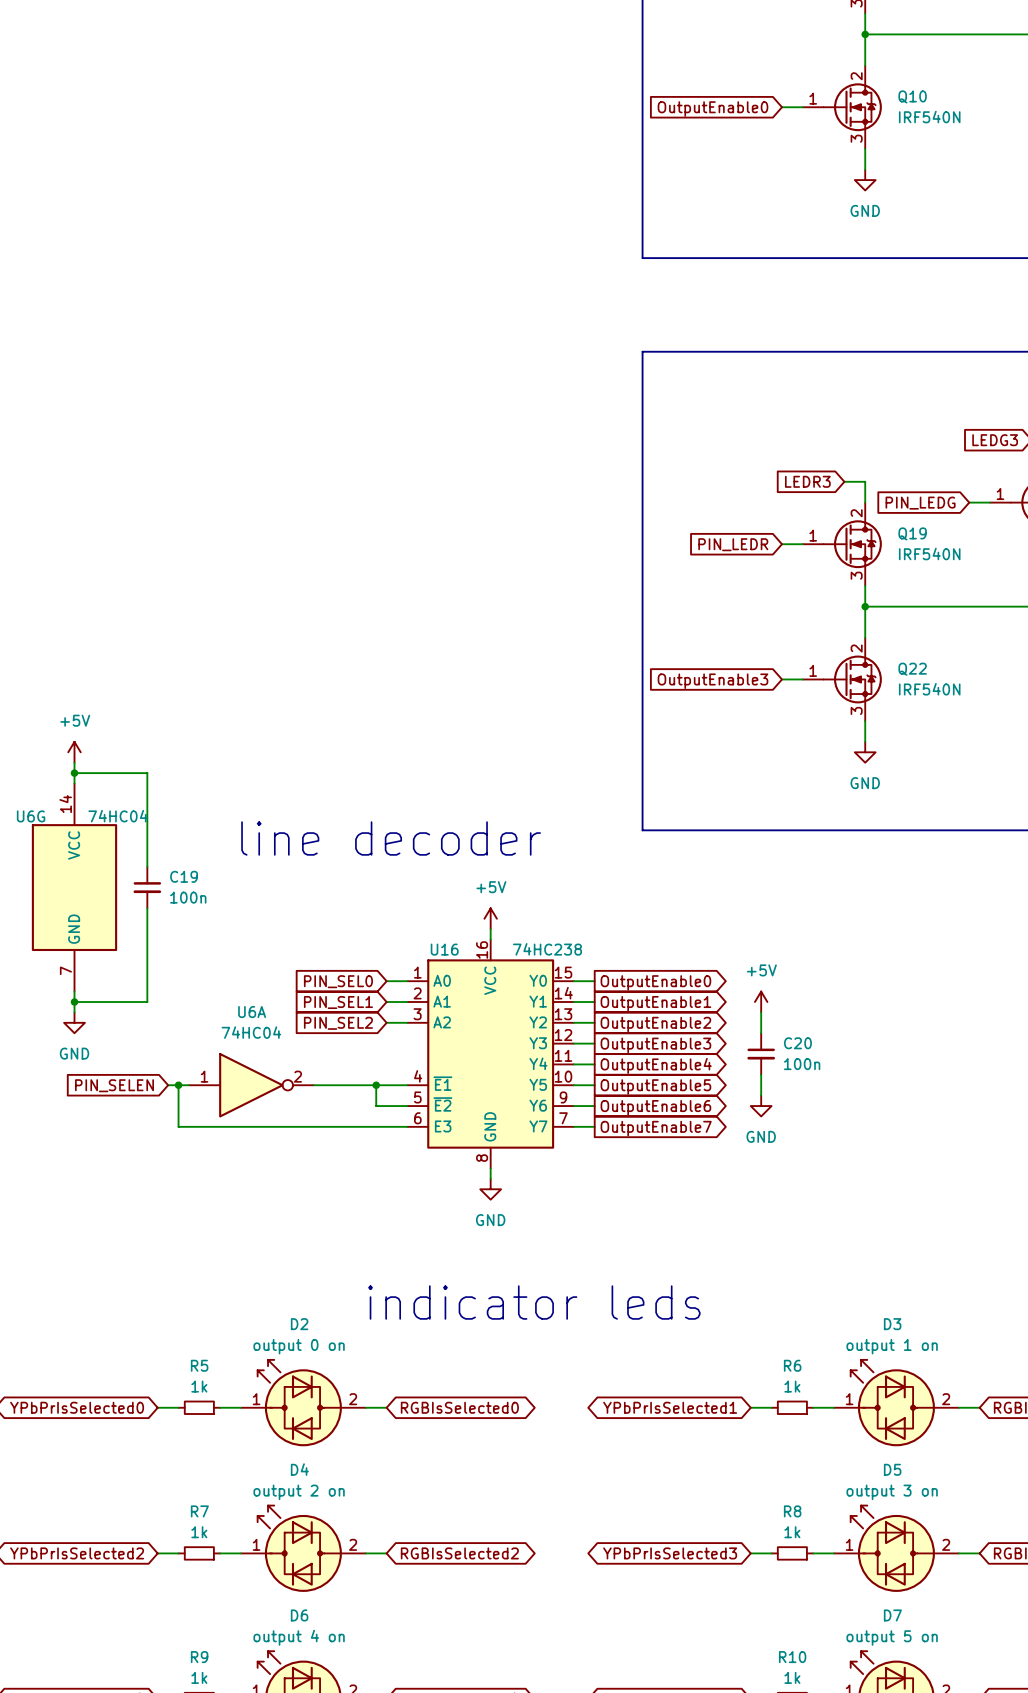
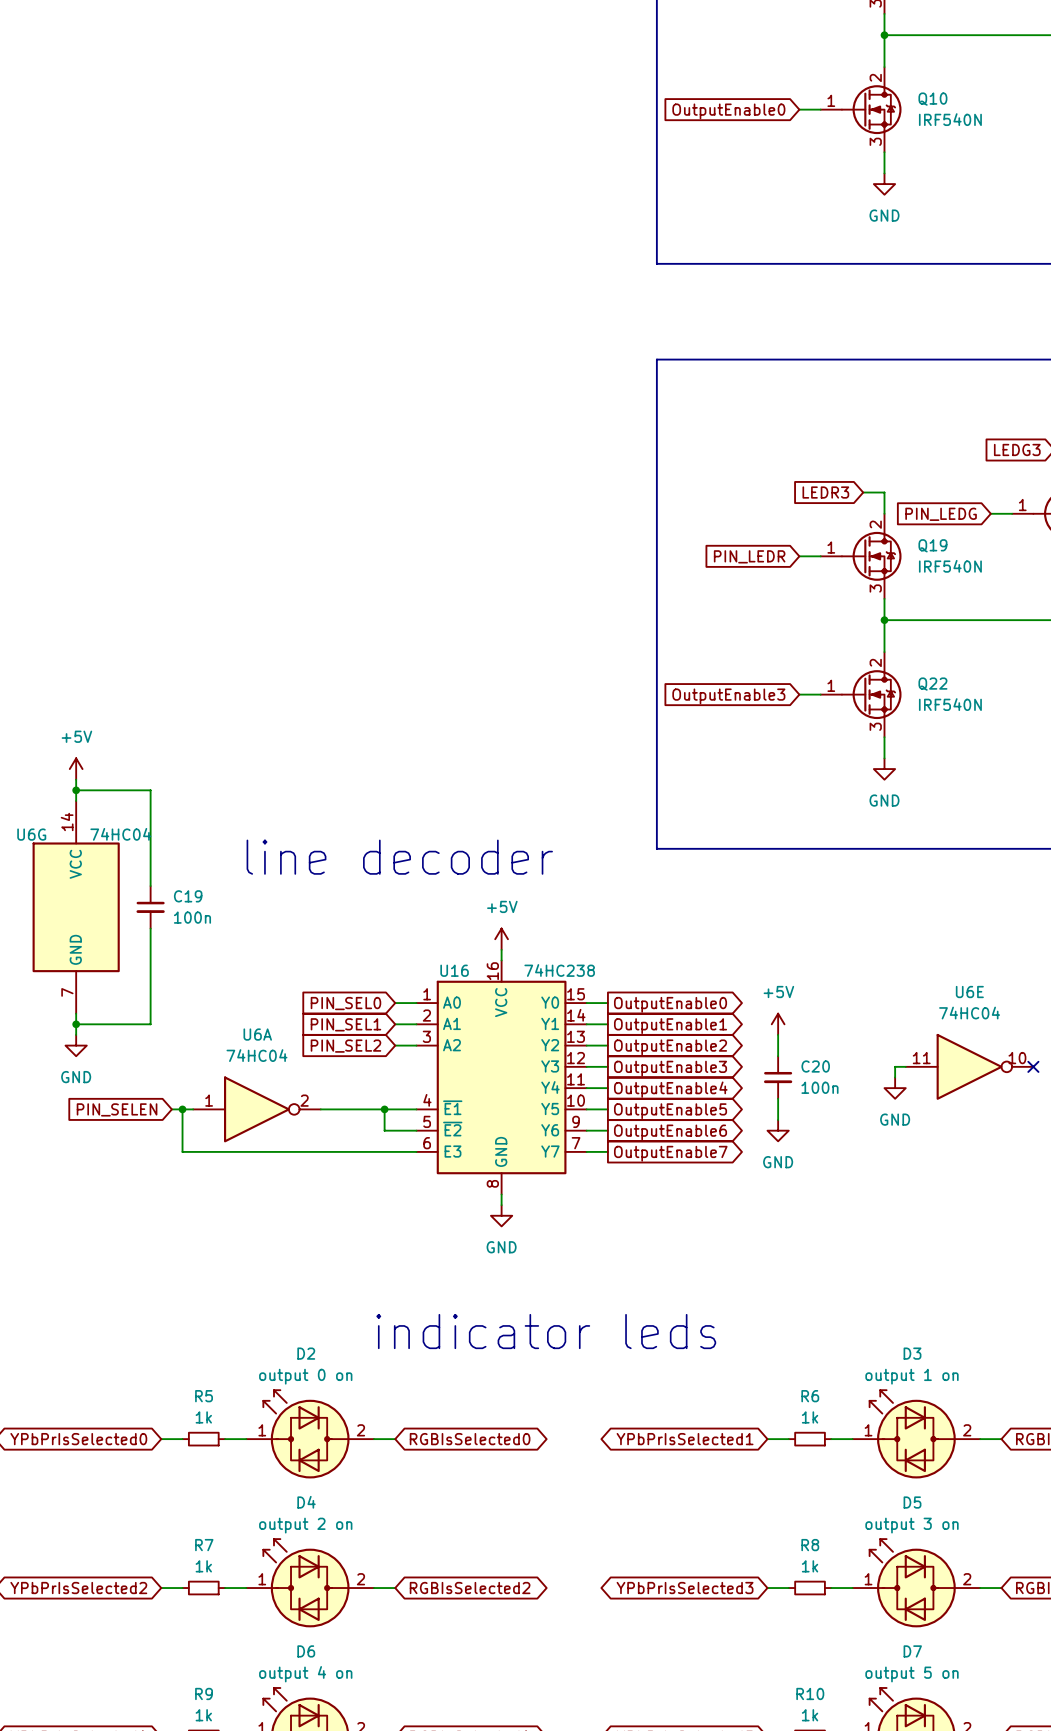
wire: none -> (905, 1066) (895, 1066) (895, 1077)
U6E: none -> 74HC04 (969, 1066)
no-connect mark: none -> (1033, 1066)
power symbol: none -> GND (895, 1088)

